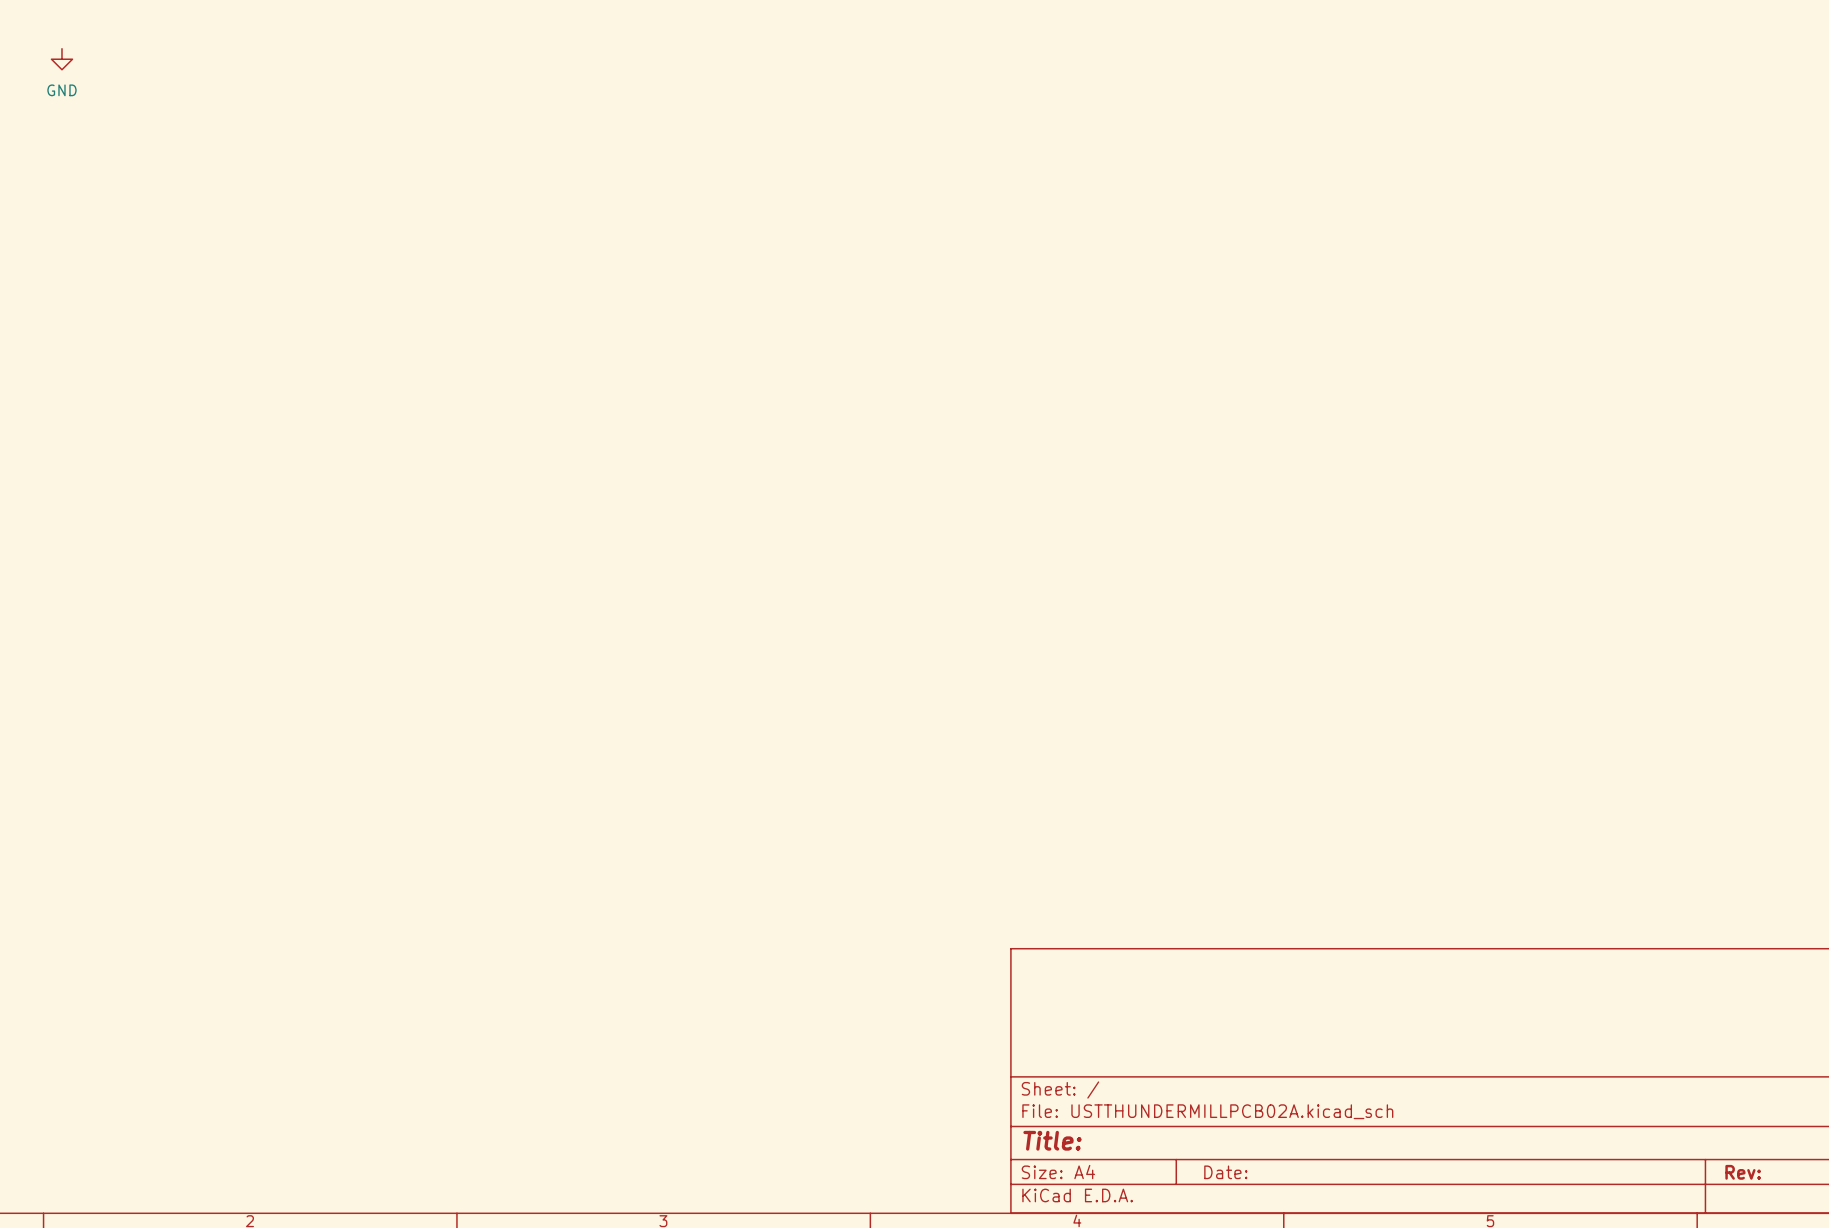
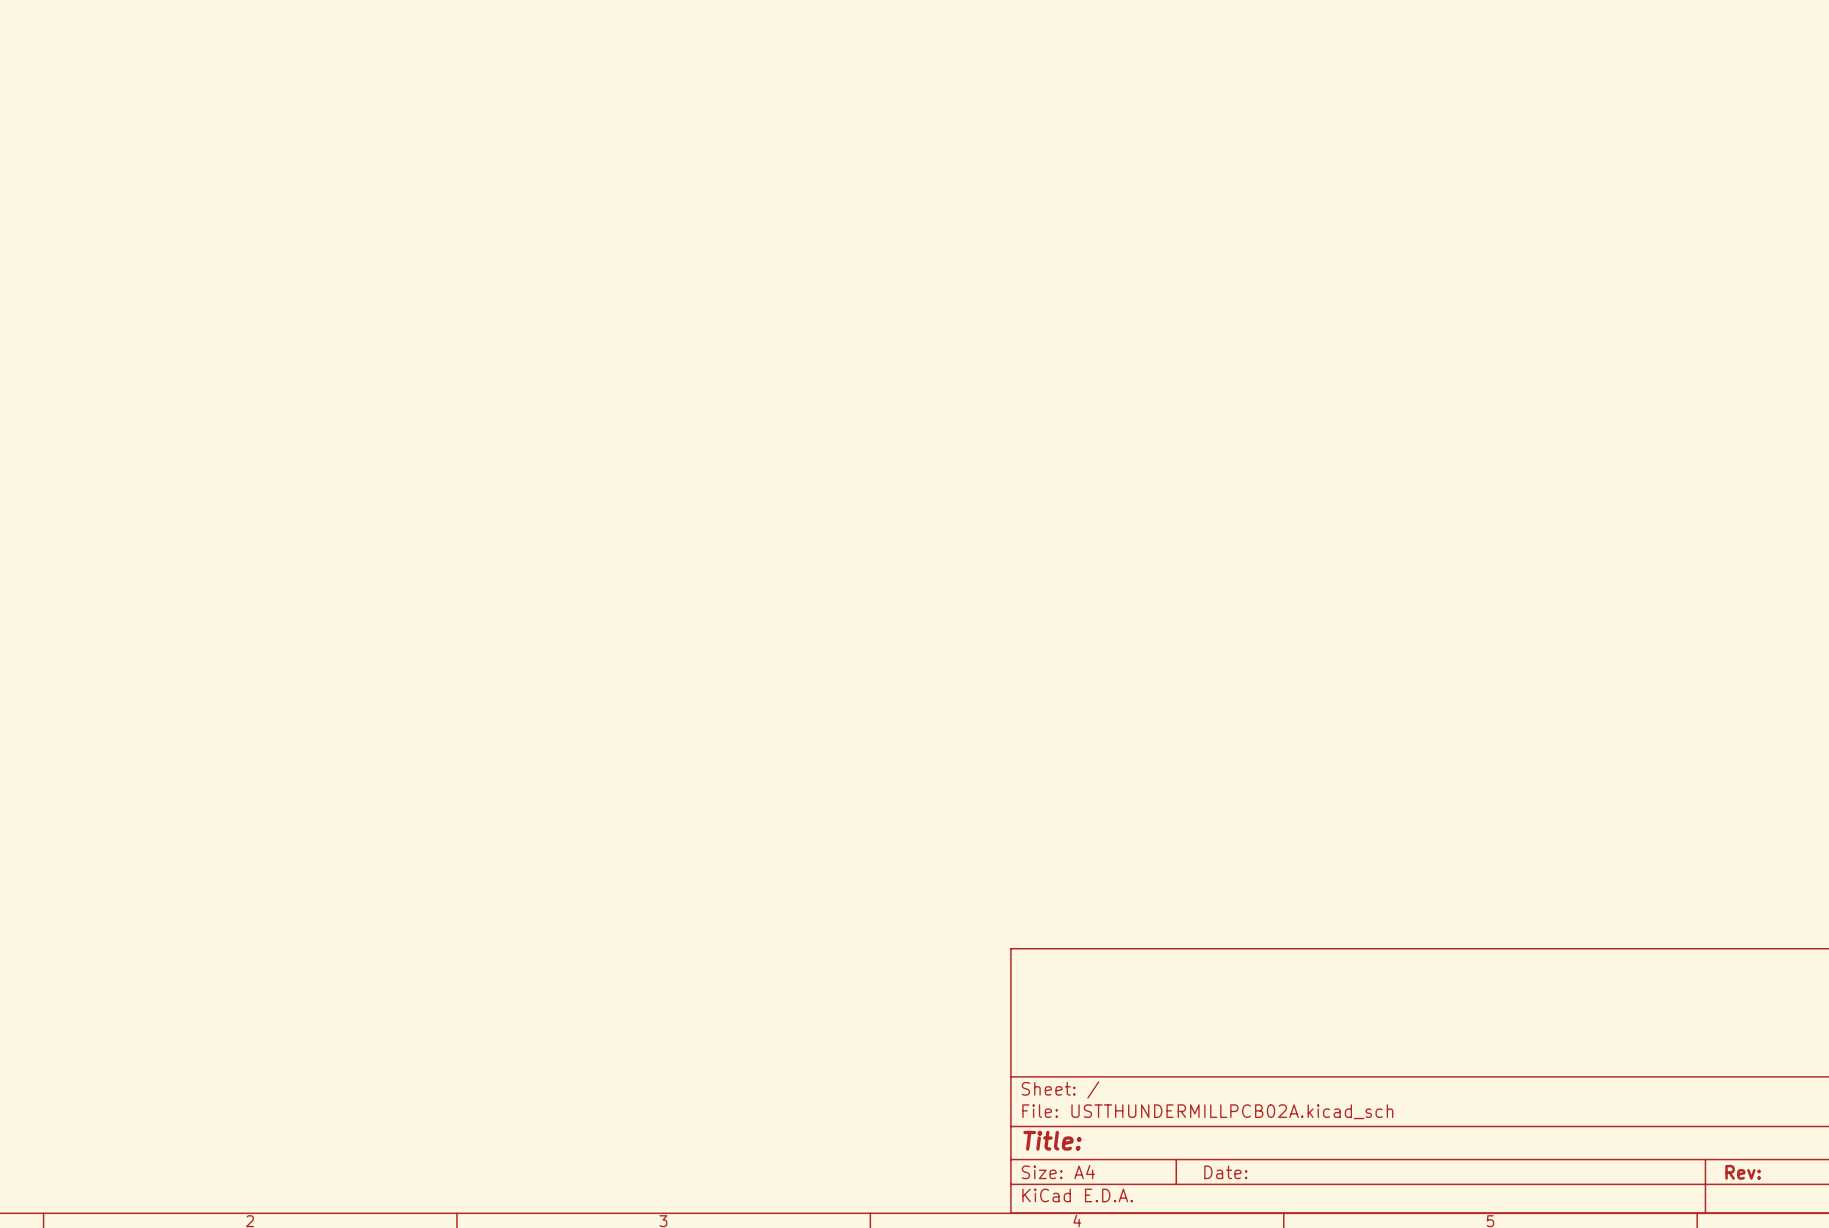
power symbol: GND (61, 59) -> none

